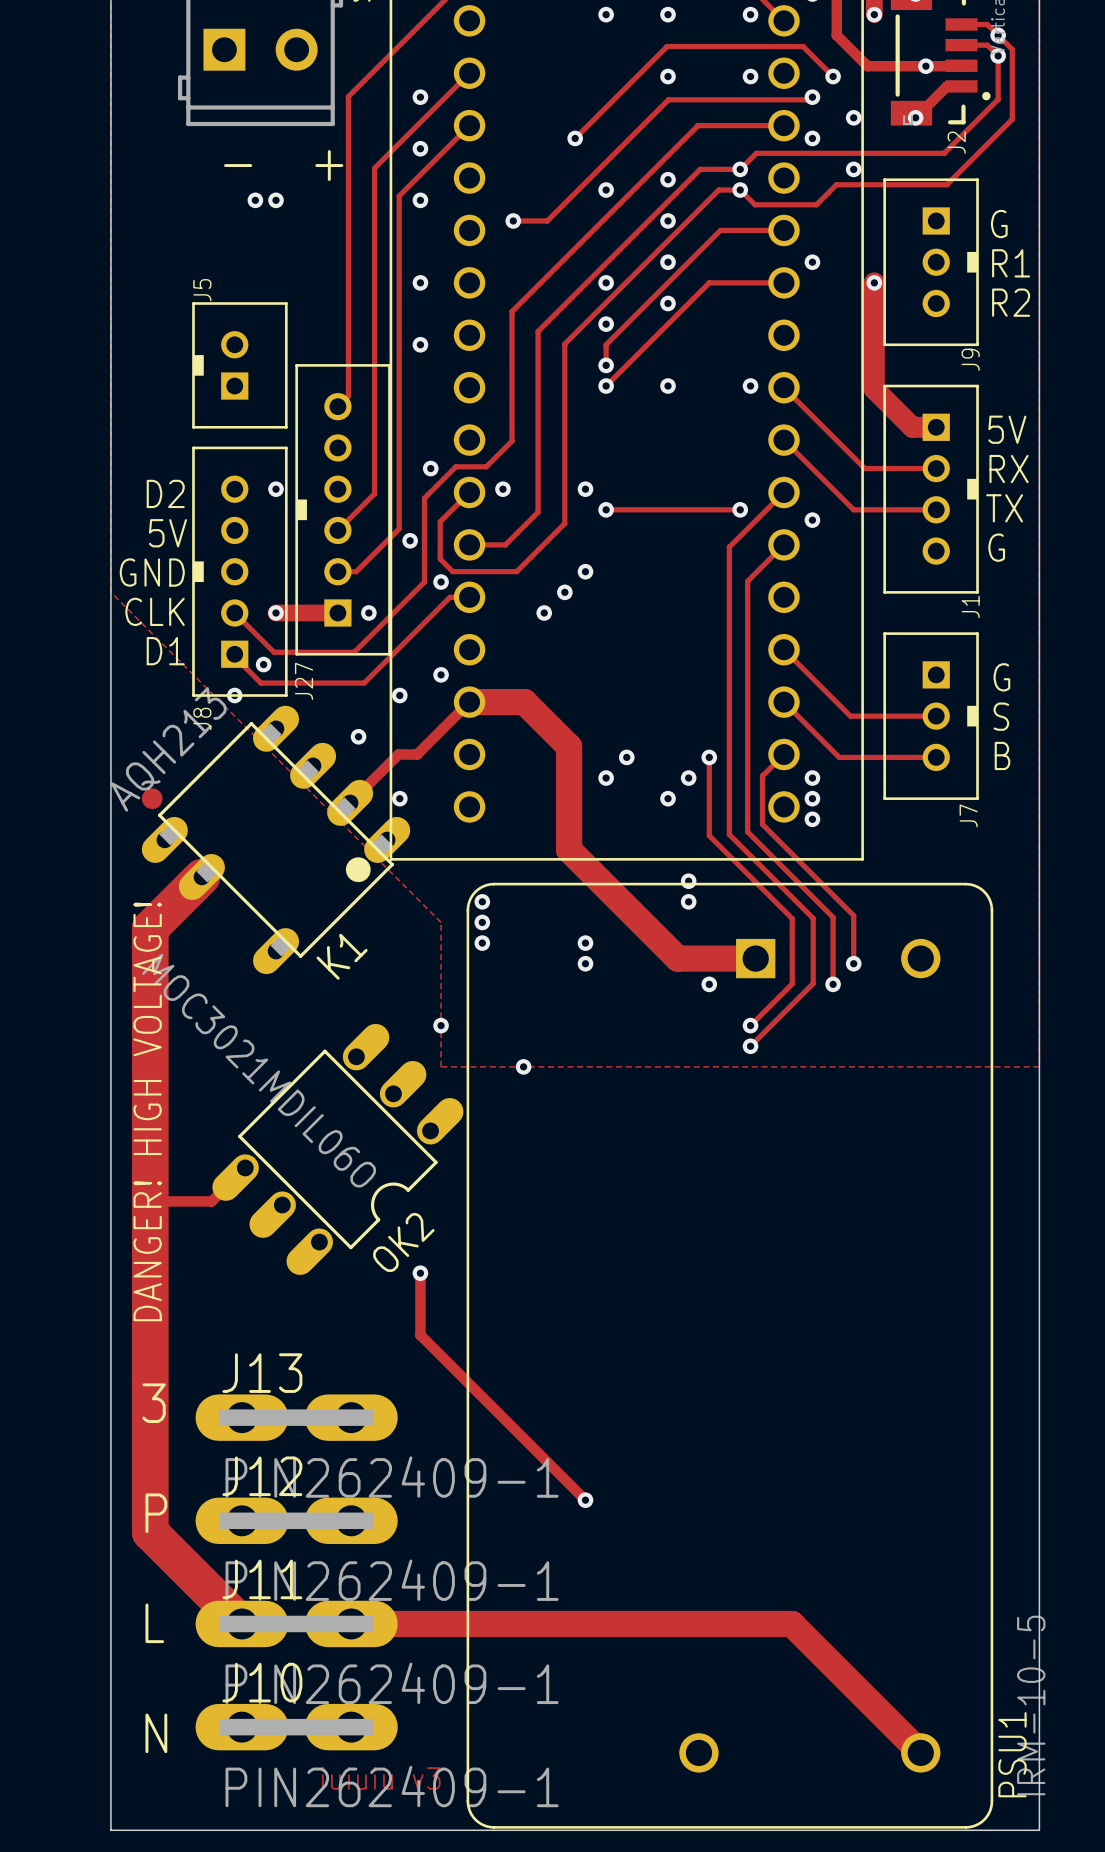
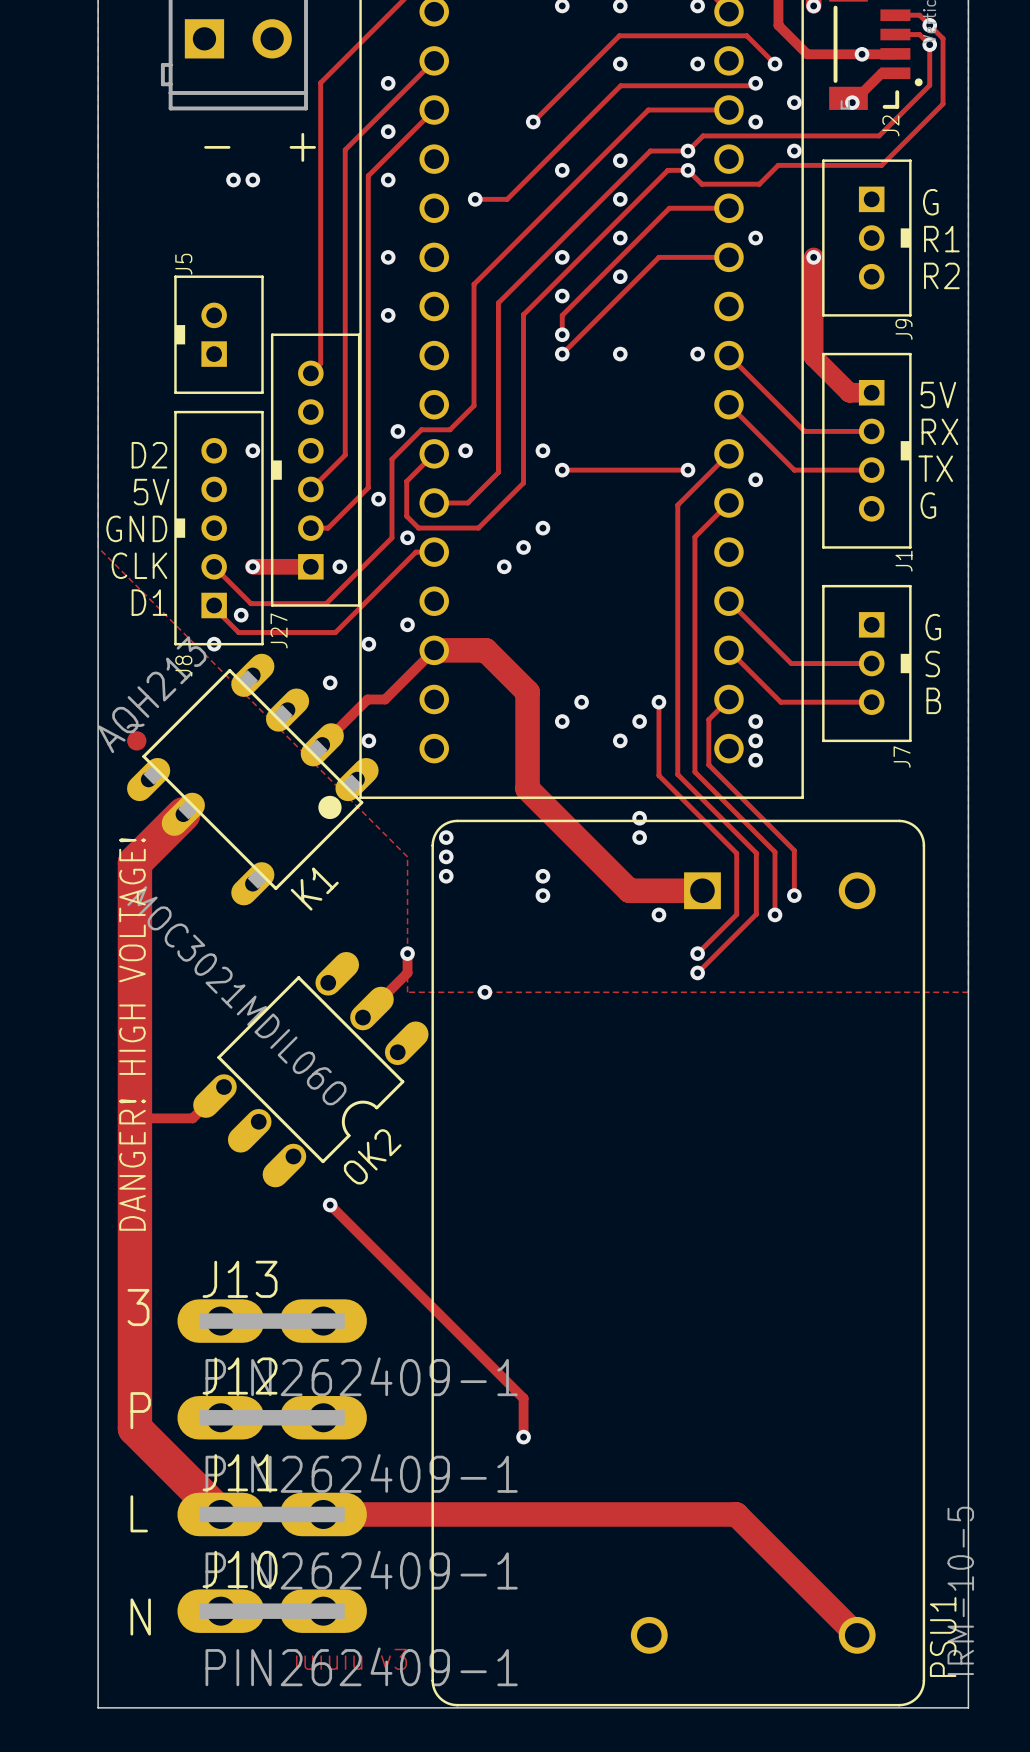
track: none -> (407, 953) (407, 972) (362, 1017)
track: (420, 1273) (420, 1335) (585, 1500) -> none
via position: (420, 1273) -> (330, 1205)
track: none -> (330, 1205) (523, 1398) (523, 1437)
via position: (585, 1500) -> (523, 1437)

